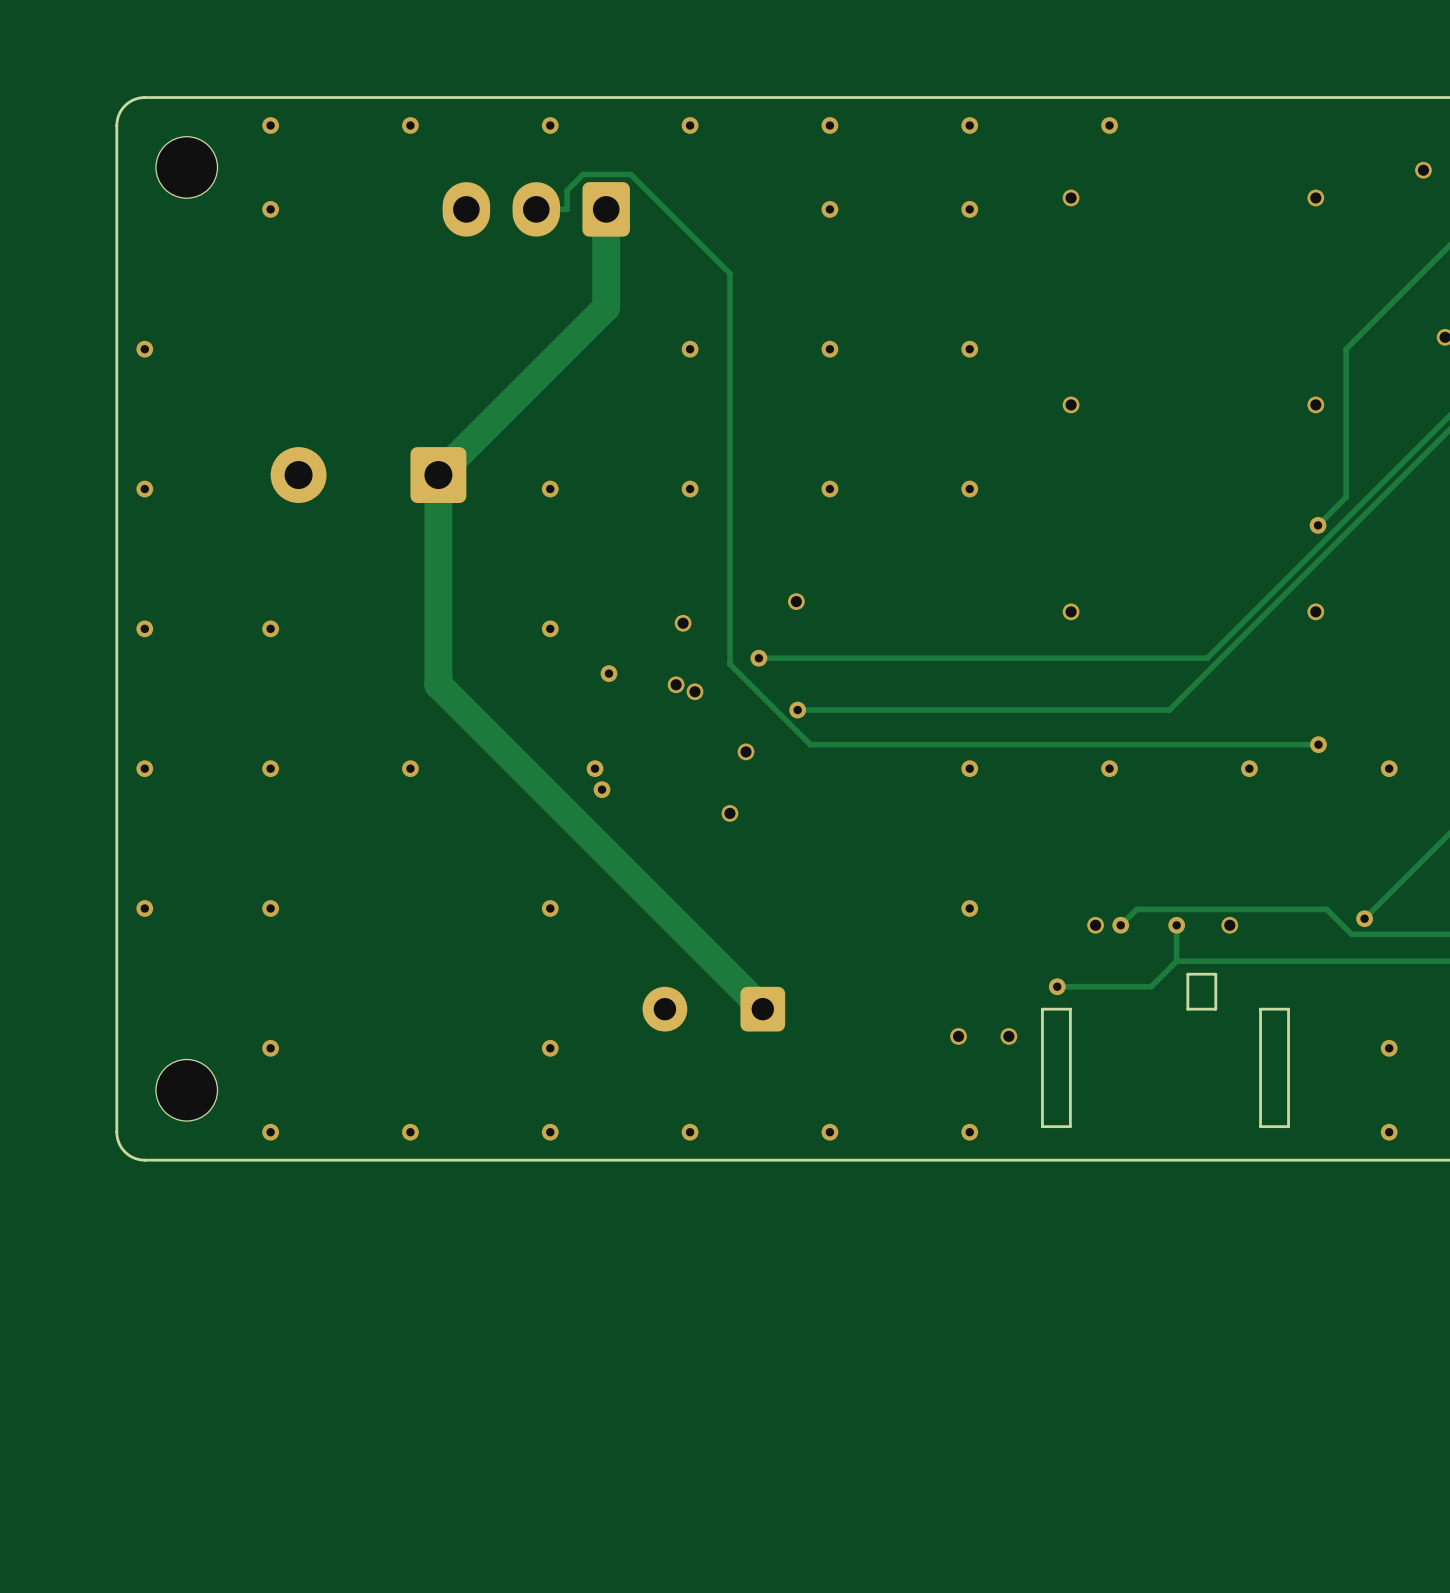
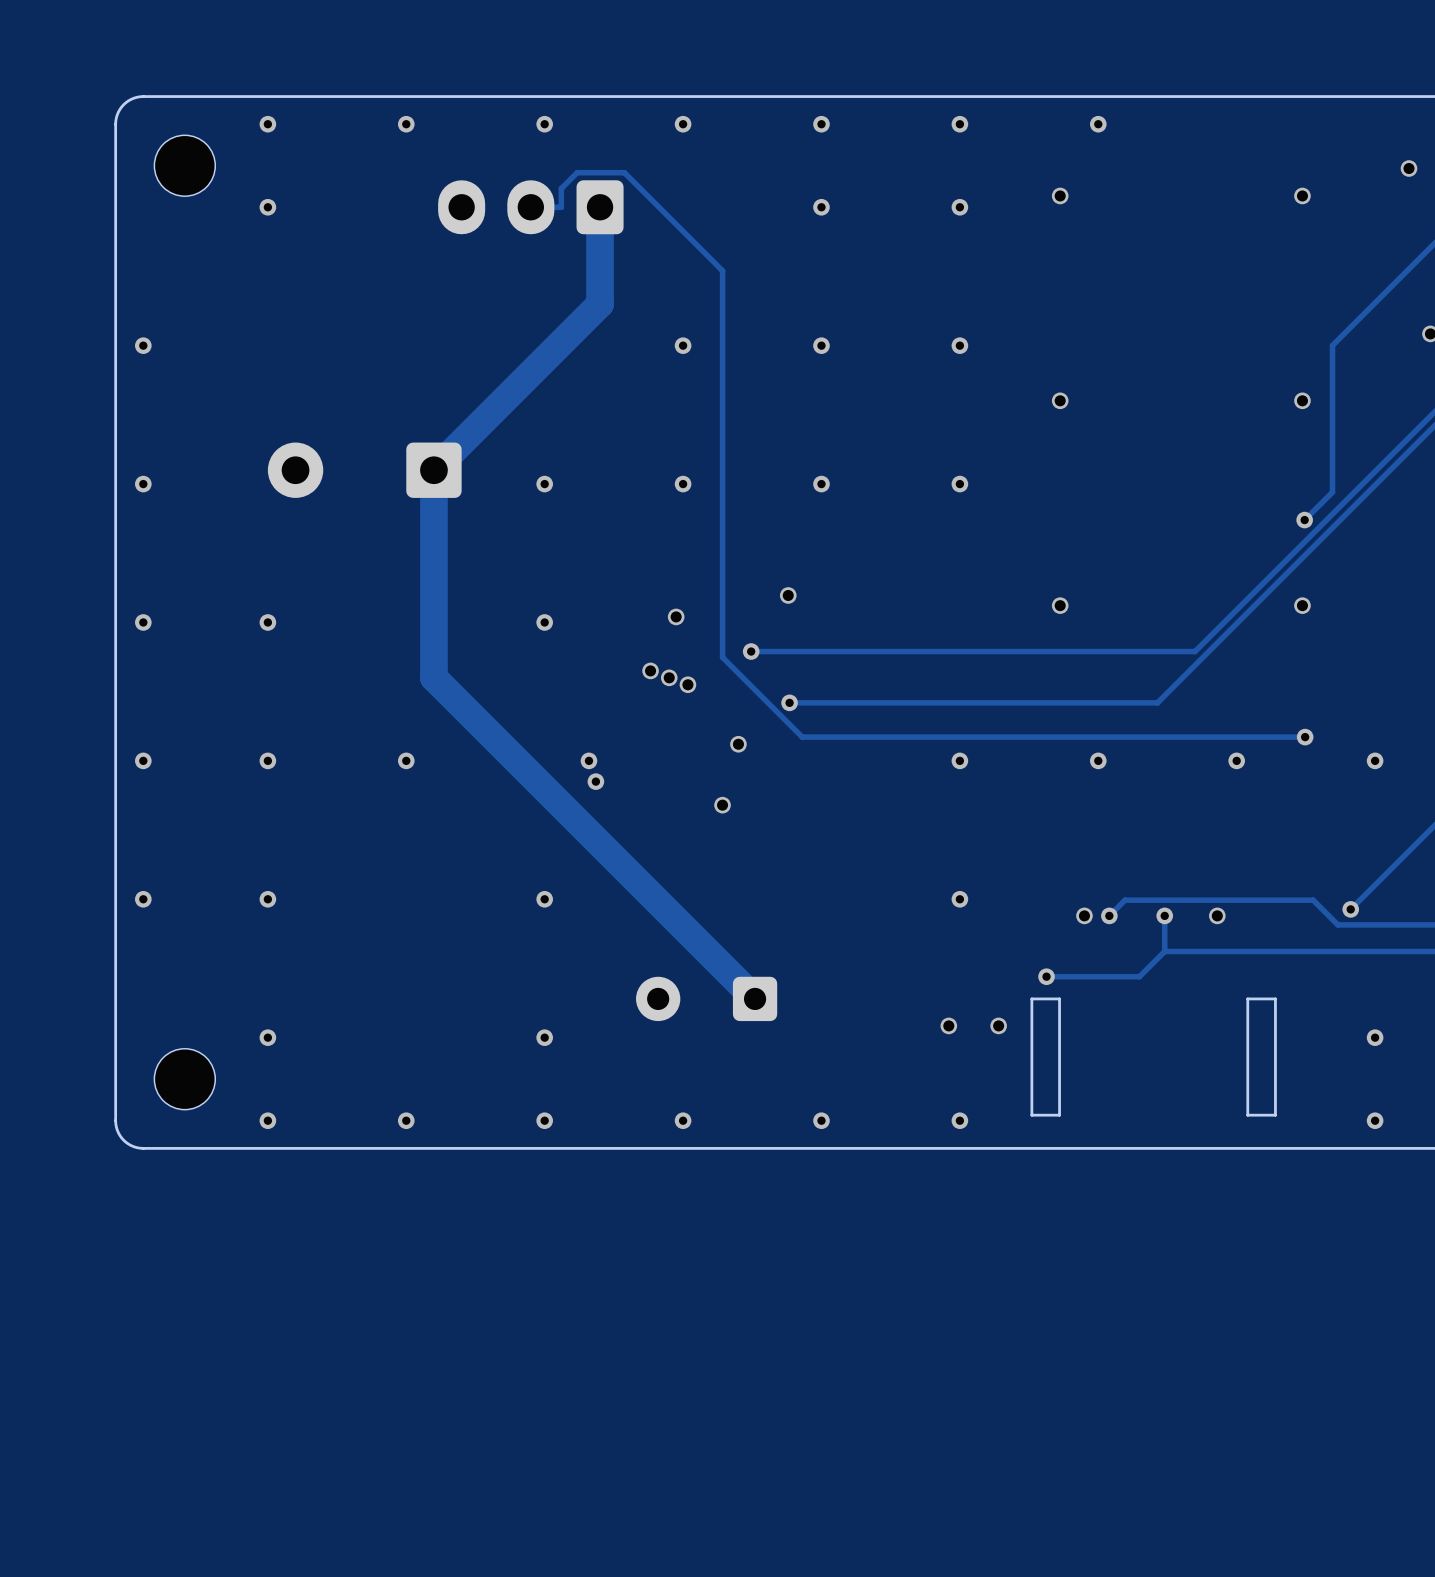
via: (608, 673) -> none
via: none -> (650, 670)
board edge: (1215, 974) (1187, 974) (1187, 1009) (1215, 1009) (1215, 974) -> none

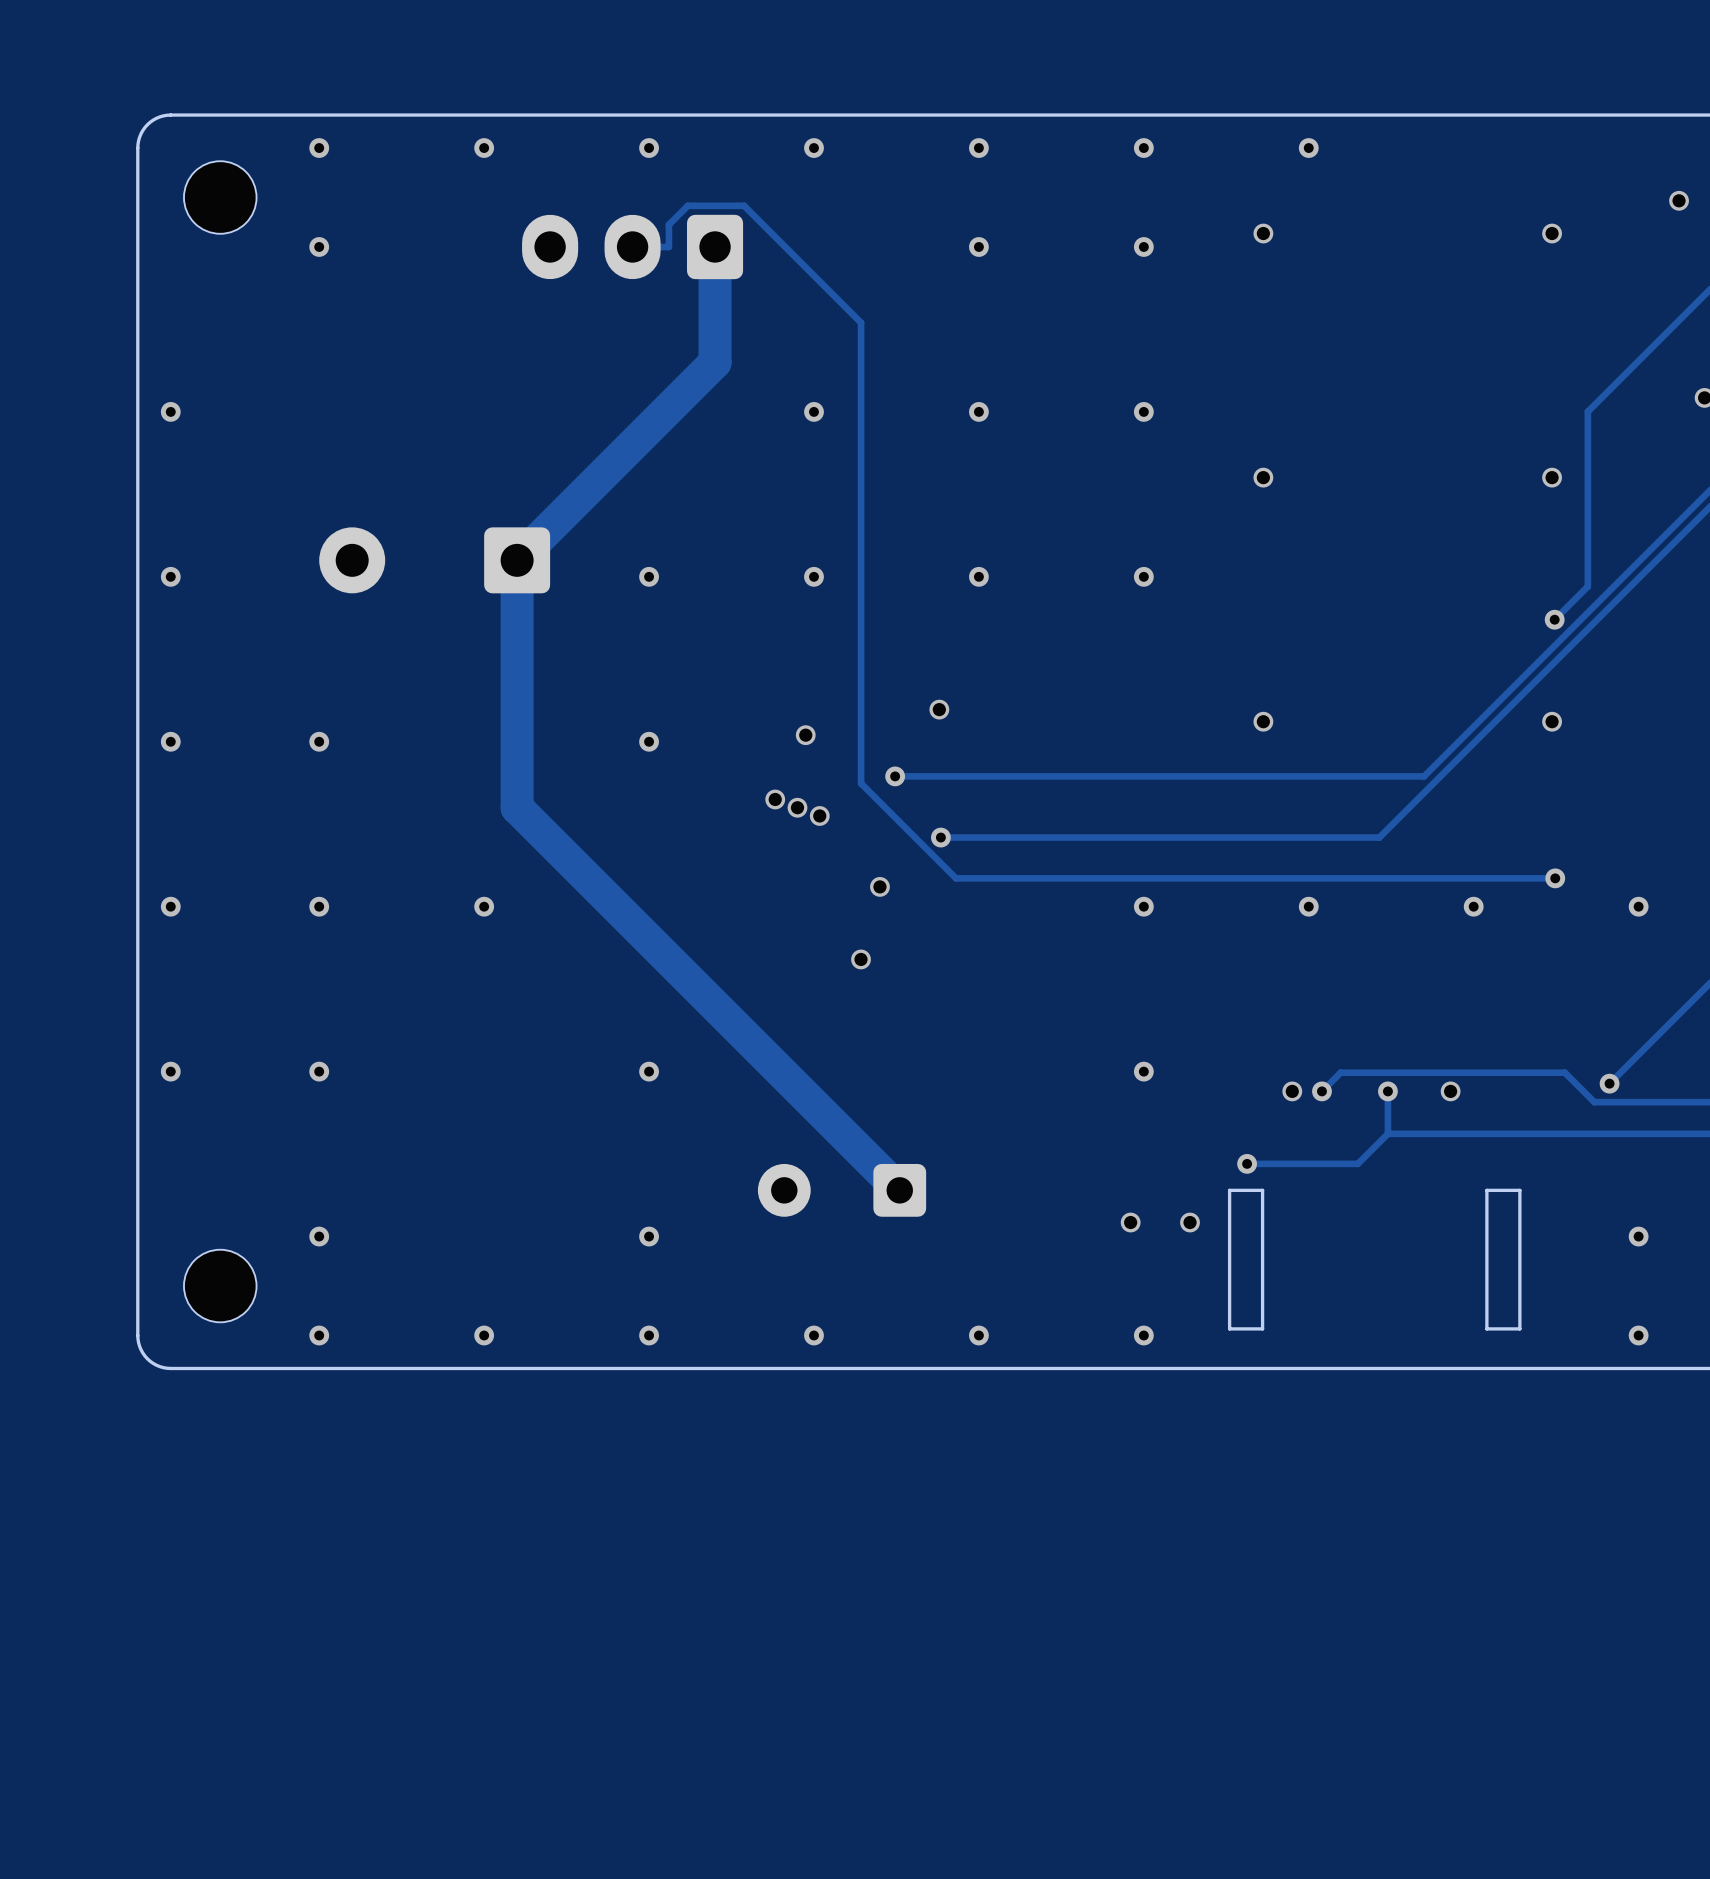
via: (588, 760) -> none
via: (595, 781) -> none

